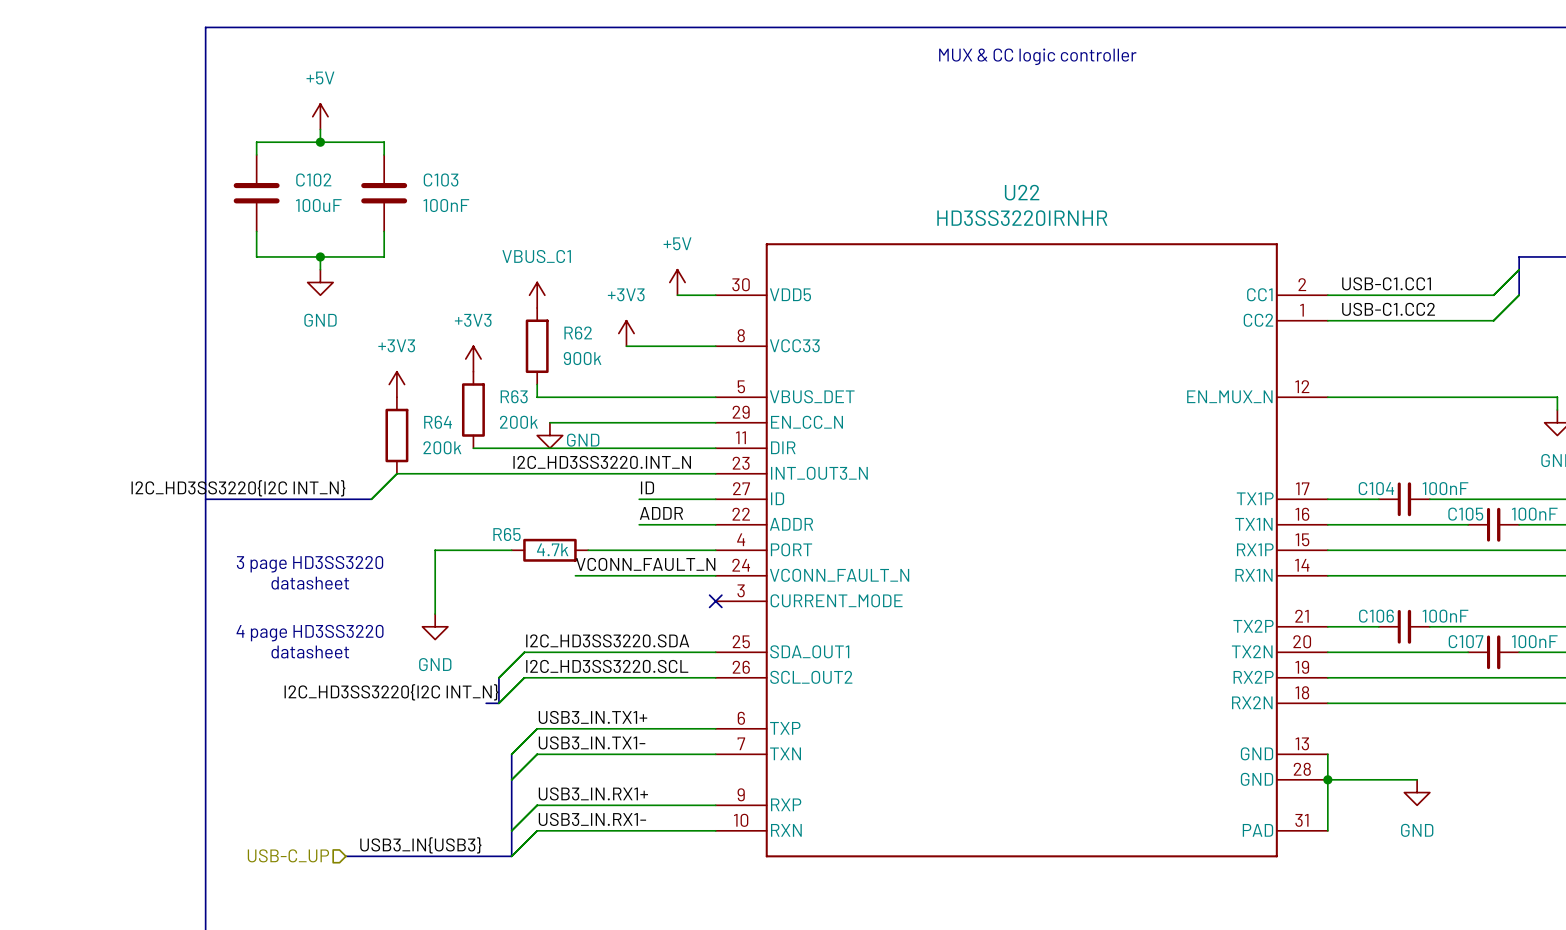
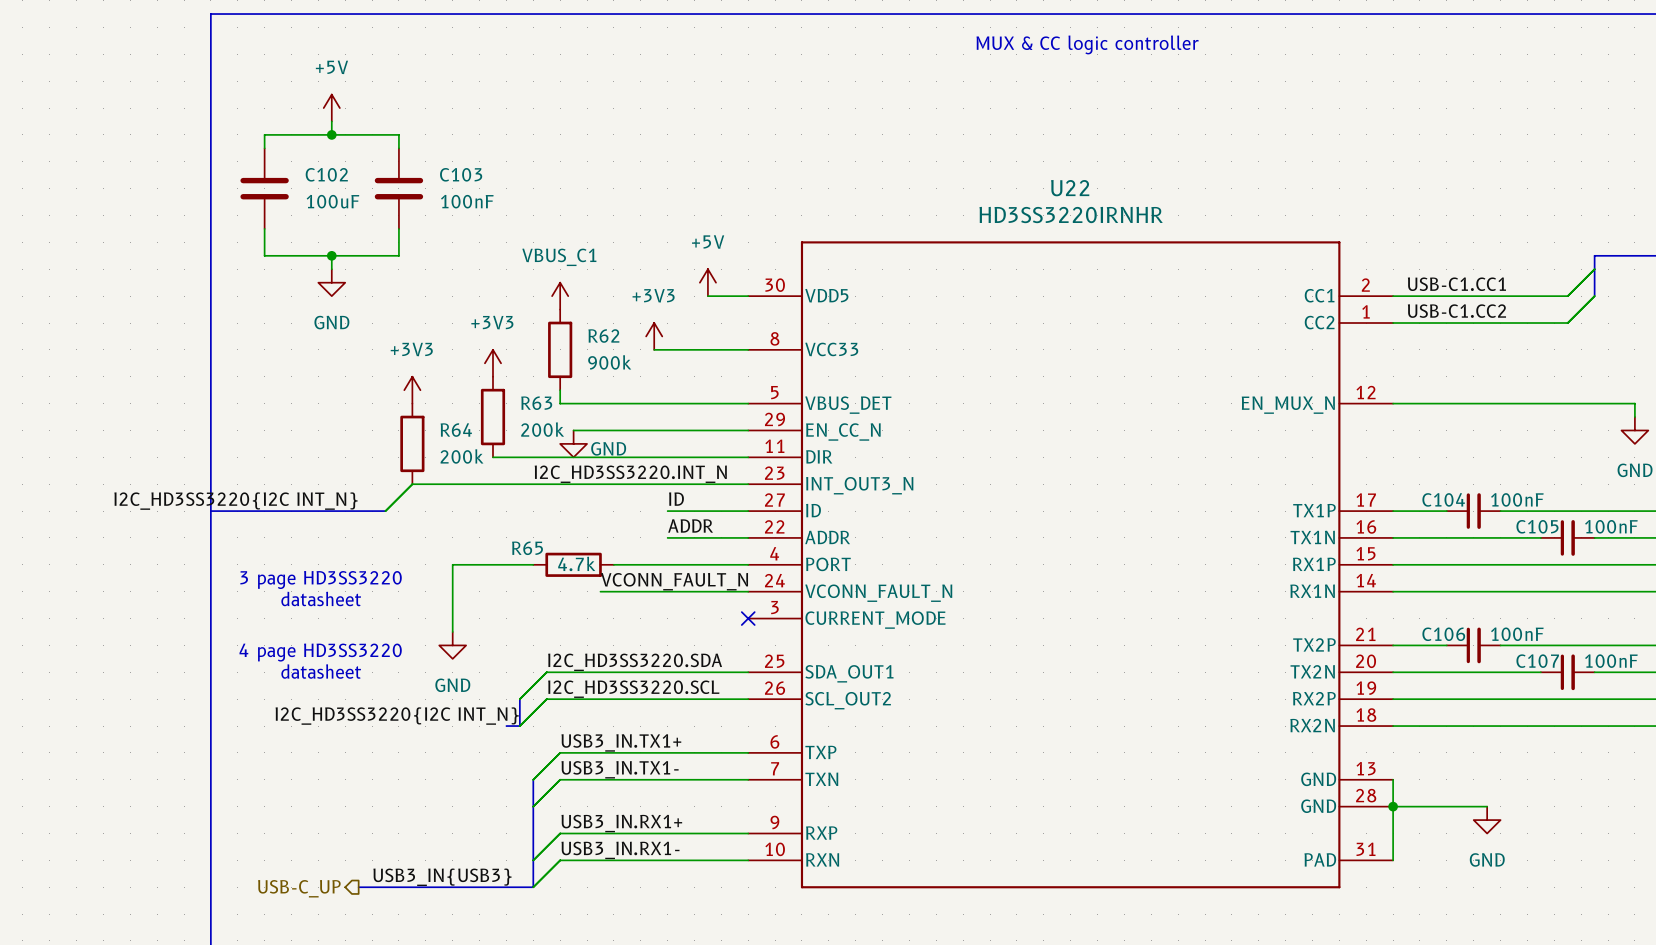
hierarchical label shape: input (288, 855) -> output (299, 888)

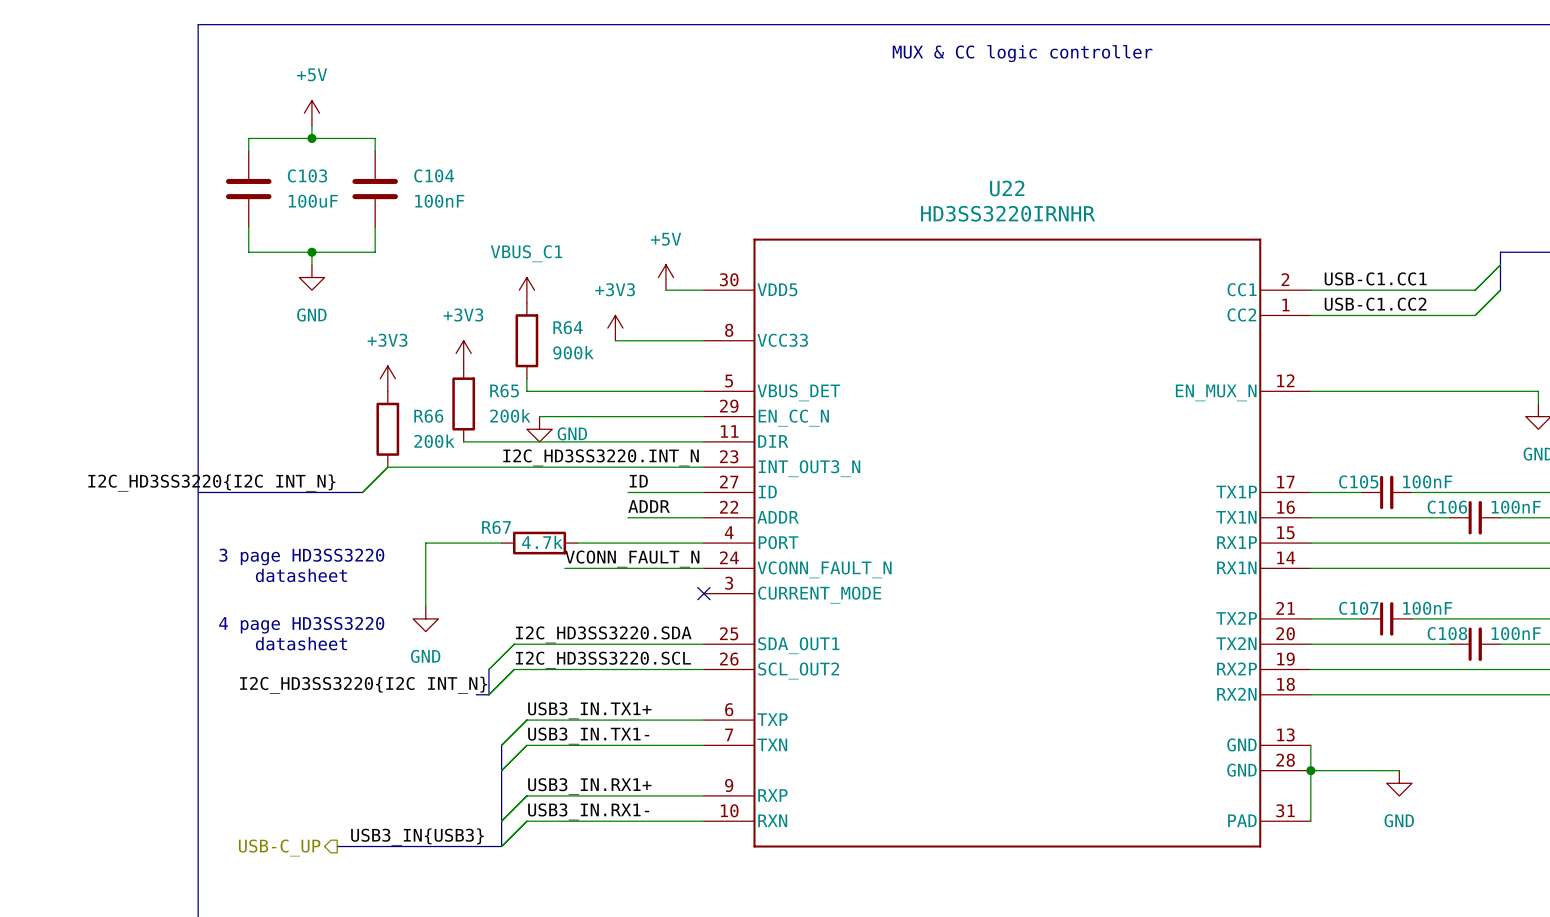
C102 name: C102 (326, 174) -> C103 (307, 175)
C103 name: C103 (461, 174) -> C104 (434, 175)
R62 name: R62 (603, 336) -> R64 (568, 327)
R63 name: R63 (536, 403) -> R65 (504, 390)
R64 name: R64 (456, 430) -> R66 (428, 416)
C104 name: C104 (1443, 499) -> C105 (1358, 481)
C105 name: C105 (1537, 526) -> C106 (1447, 507)
R65 name: R65 (527, 548) -> R67 (496, 527)
C106 name: C106 (1443, 634) -> C107 (1358, 608)
C107 name: C107 (1537, 661) -> C108 (1447, 633)

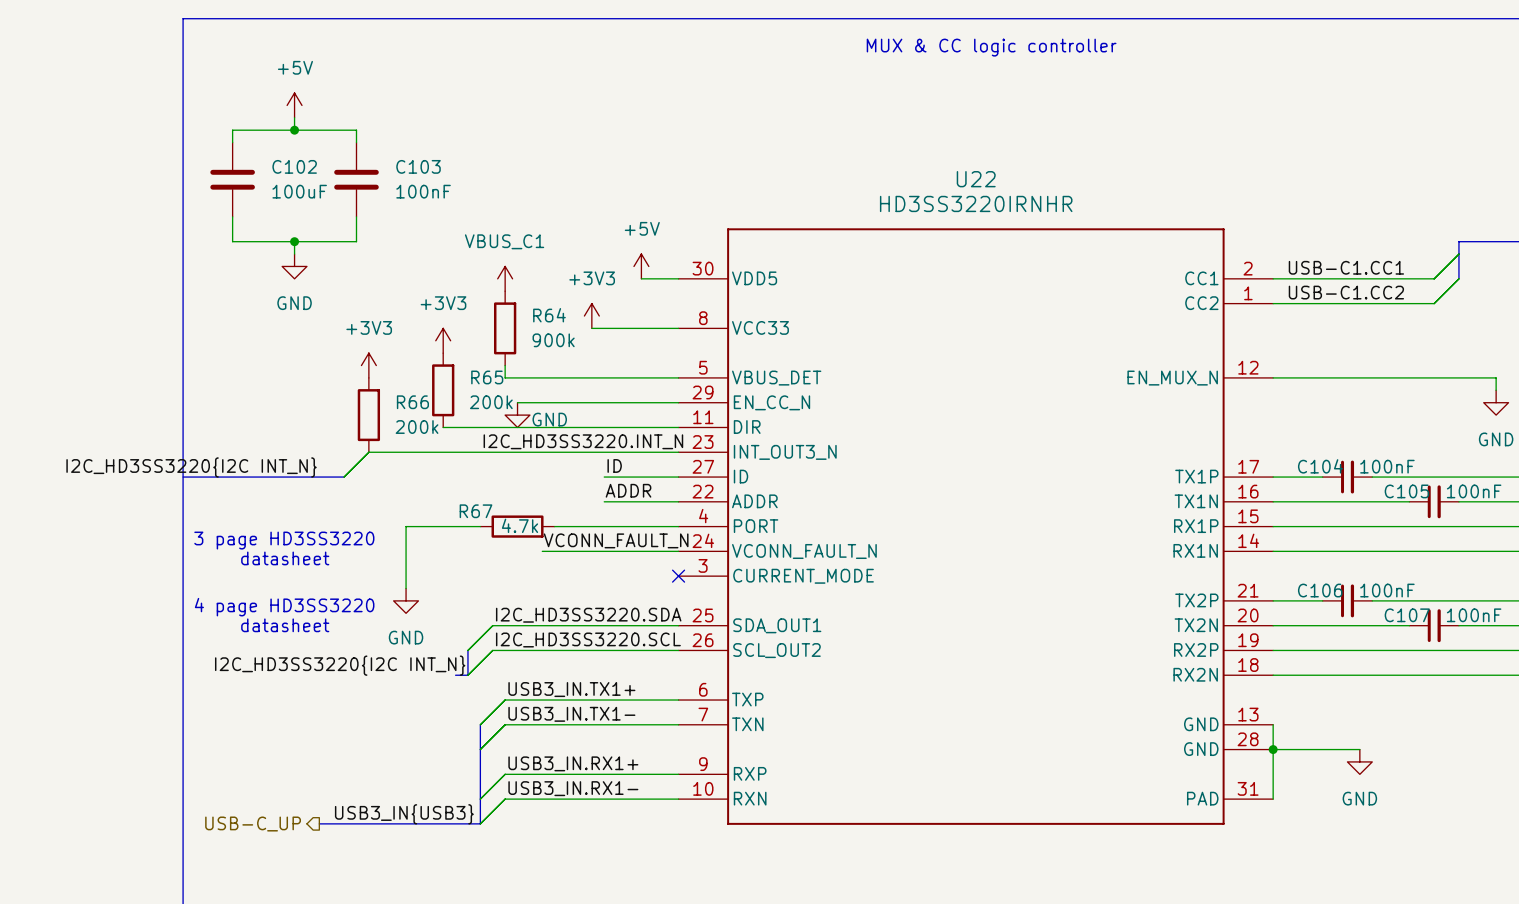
C103 name: C103 (307, 175) -> C102 (294, 166)
C104 name: C104 (434, 175) -> C103 (418, 166)
C105 name: C105 (1358, 481) -> C104 (1320, 466)
C106 name: C106 (1447, 507) -> C105 (1406, 491)
C107 name: C107 (1358, 608) -> C106 (1320, 590)
C108 name: C108 (1447, 633) -> C107 (1407, 615)

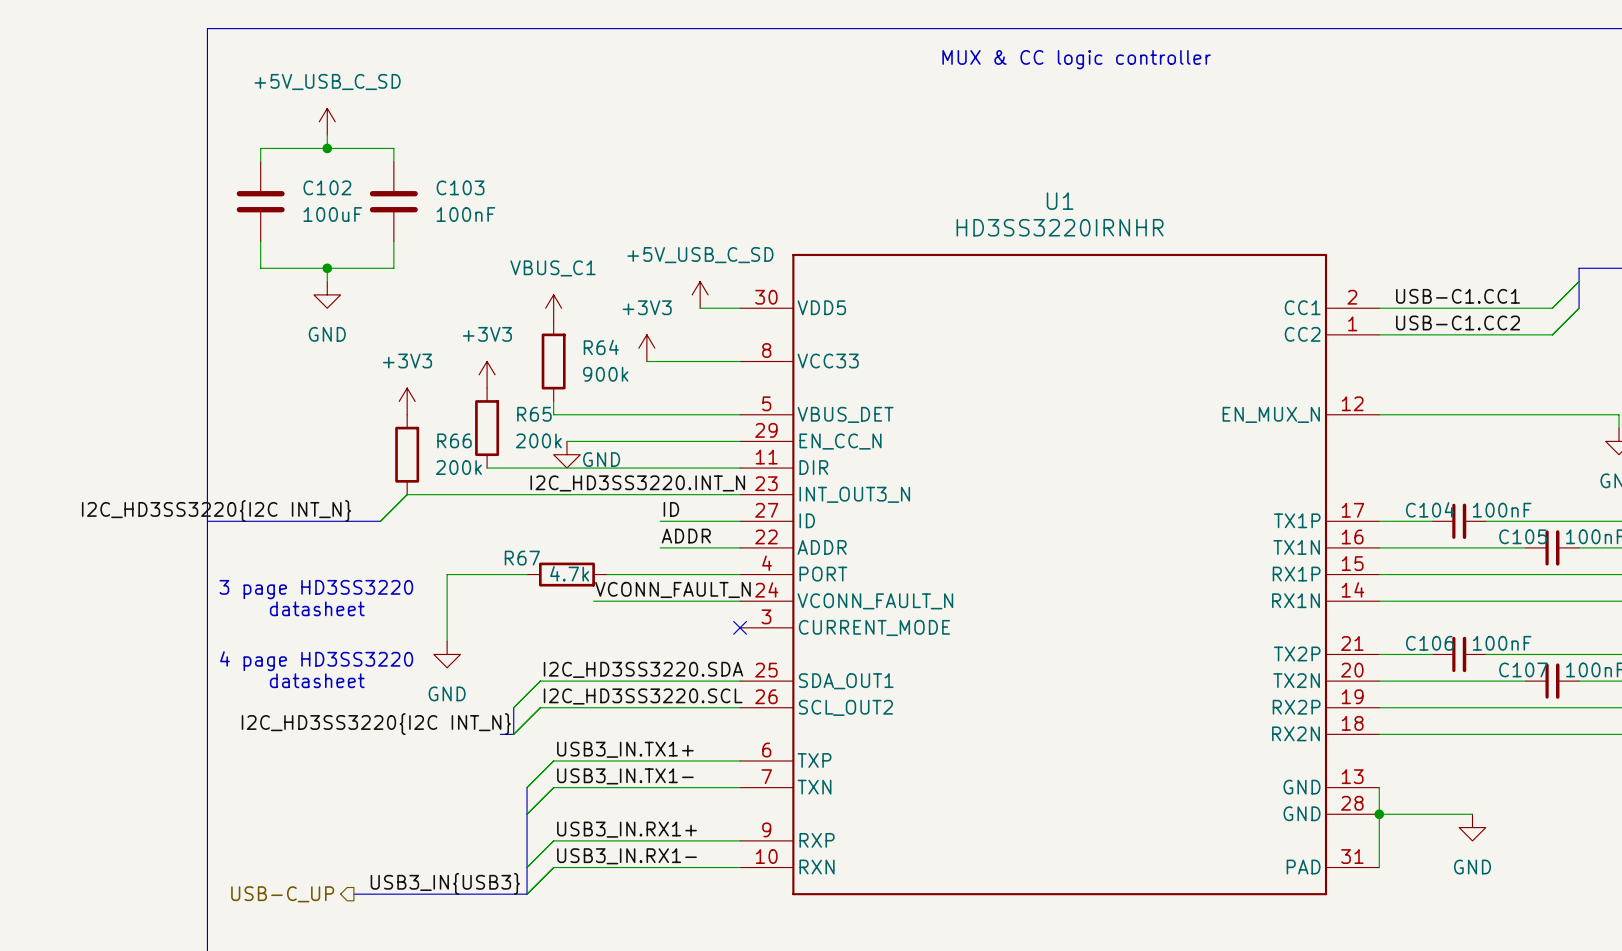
power symbol: +5V (294, 105) -> +5V_USB_C_SD (327, 121)
U22 name: U22 (976, 179) -> U1 (1060, 201)
power symbol: +5V (641, 266) -> +5V_USB_C_SD (700, 294)

